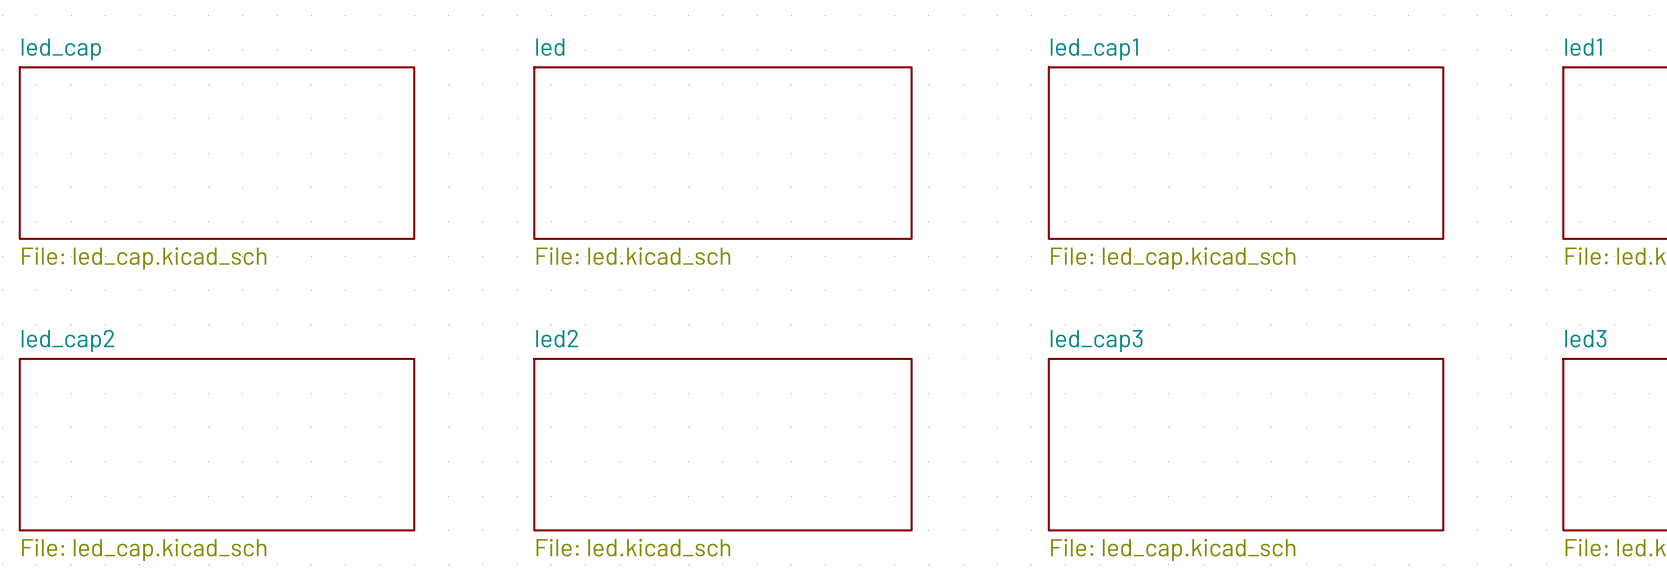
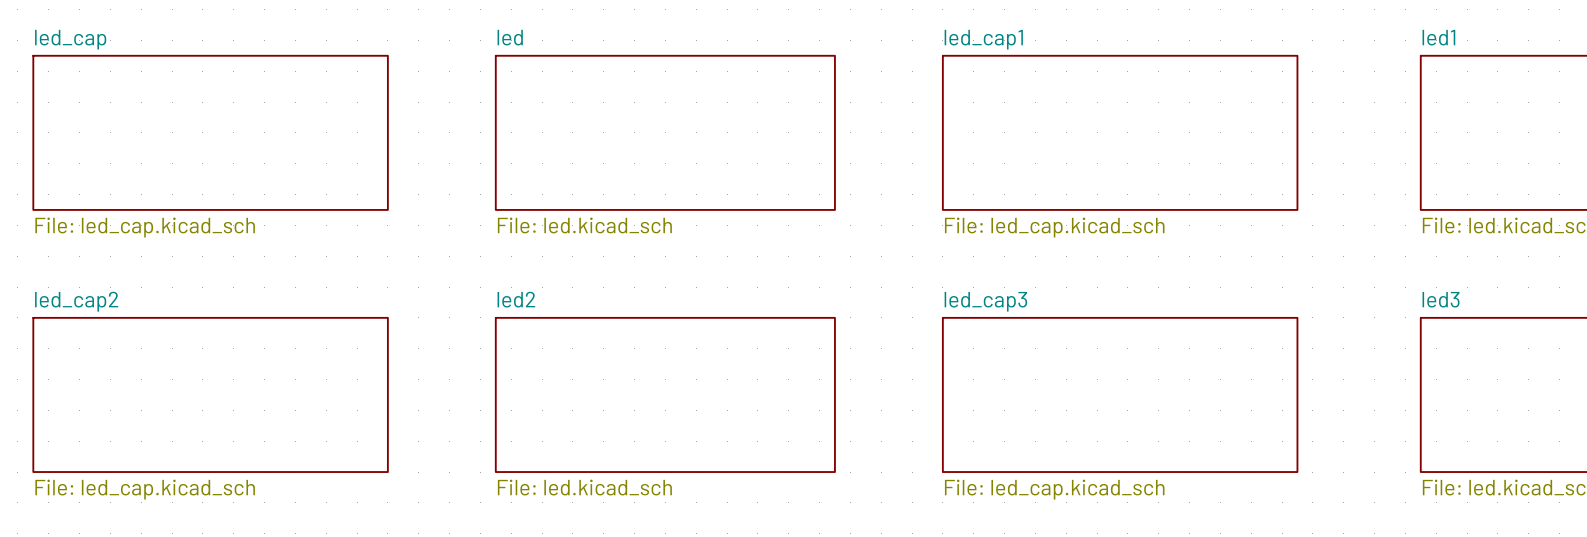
sheet led_cap1 position: (1246, 153) -> (1120, 132)
sheet led_cap3 position: (1246, 444) -> (1120, 394)

